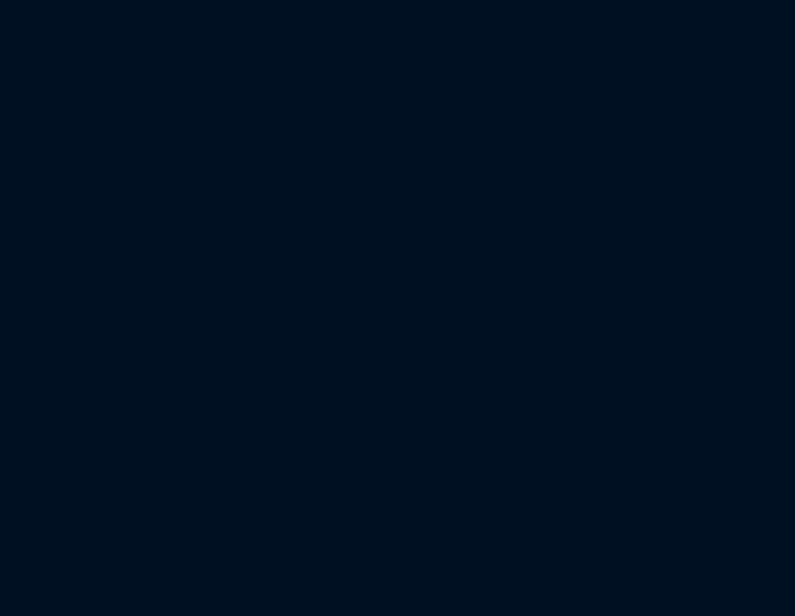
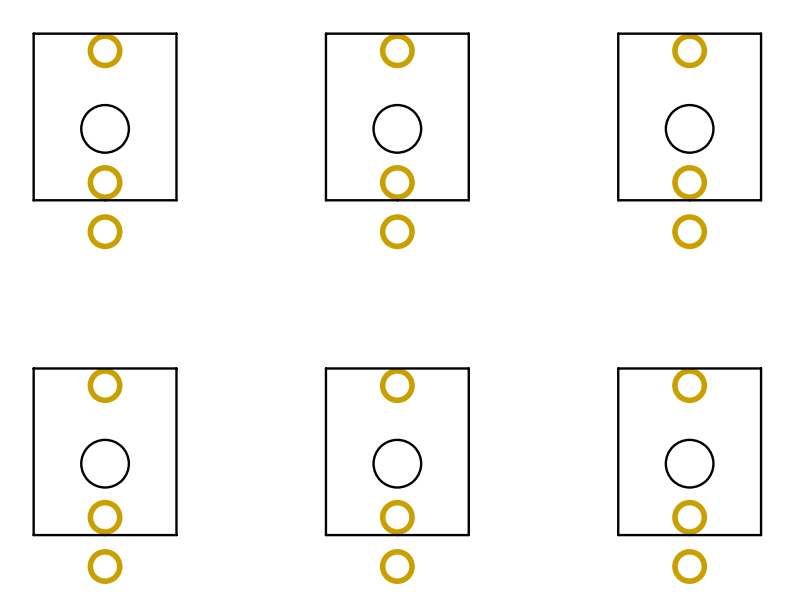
part: none -> (105, 140)
part: none -> (397, 140)
part: none -> (689, 140)
part: none -> (105, 475)
part: none -> (397, 475)
part: none -> (689, 475)

